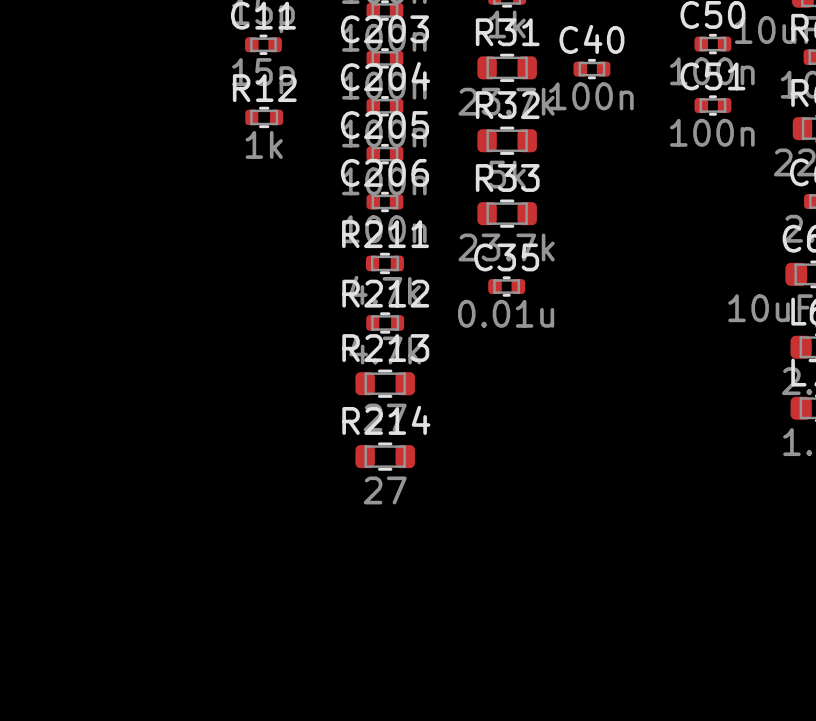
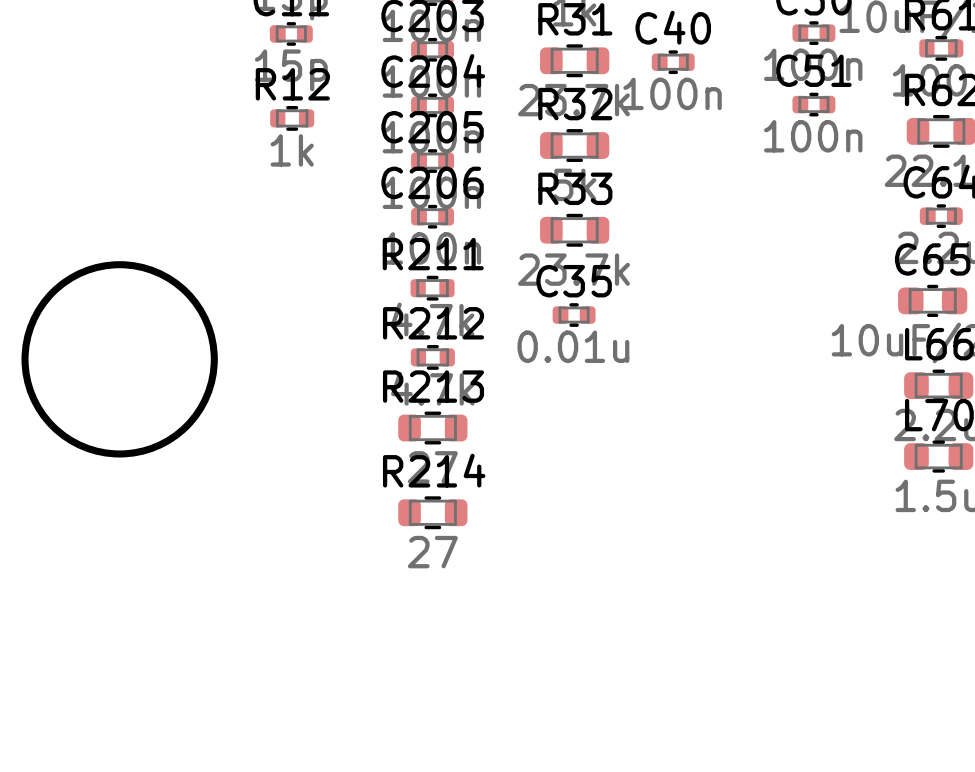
round board edge: none -> [21, 261, 218, 458]

